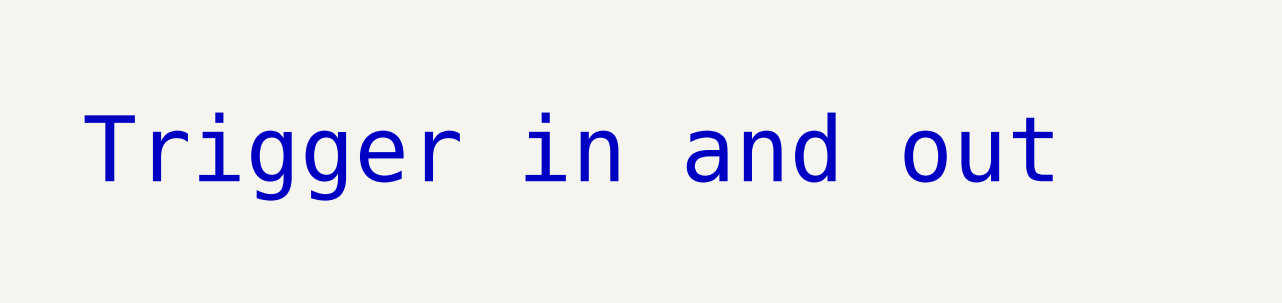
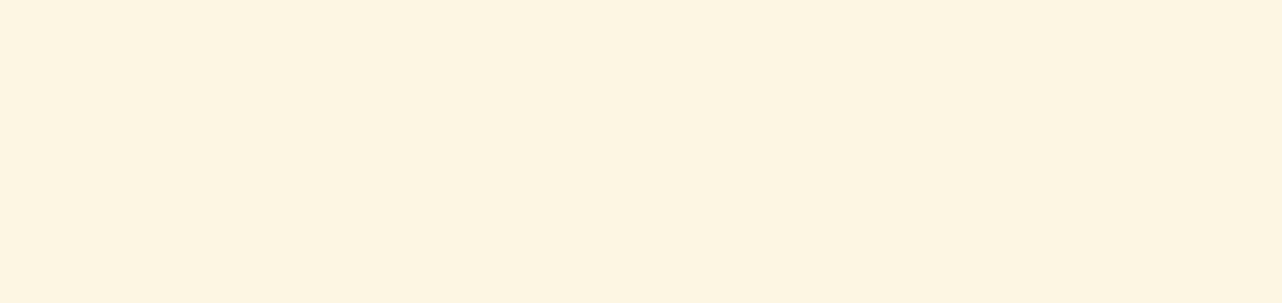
text: Trigger in and out (568, 156) -> none

